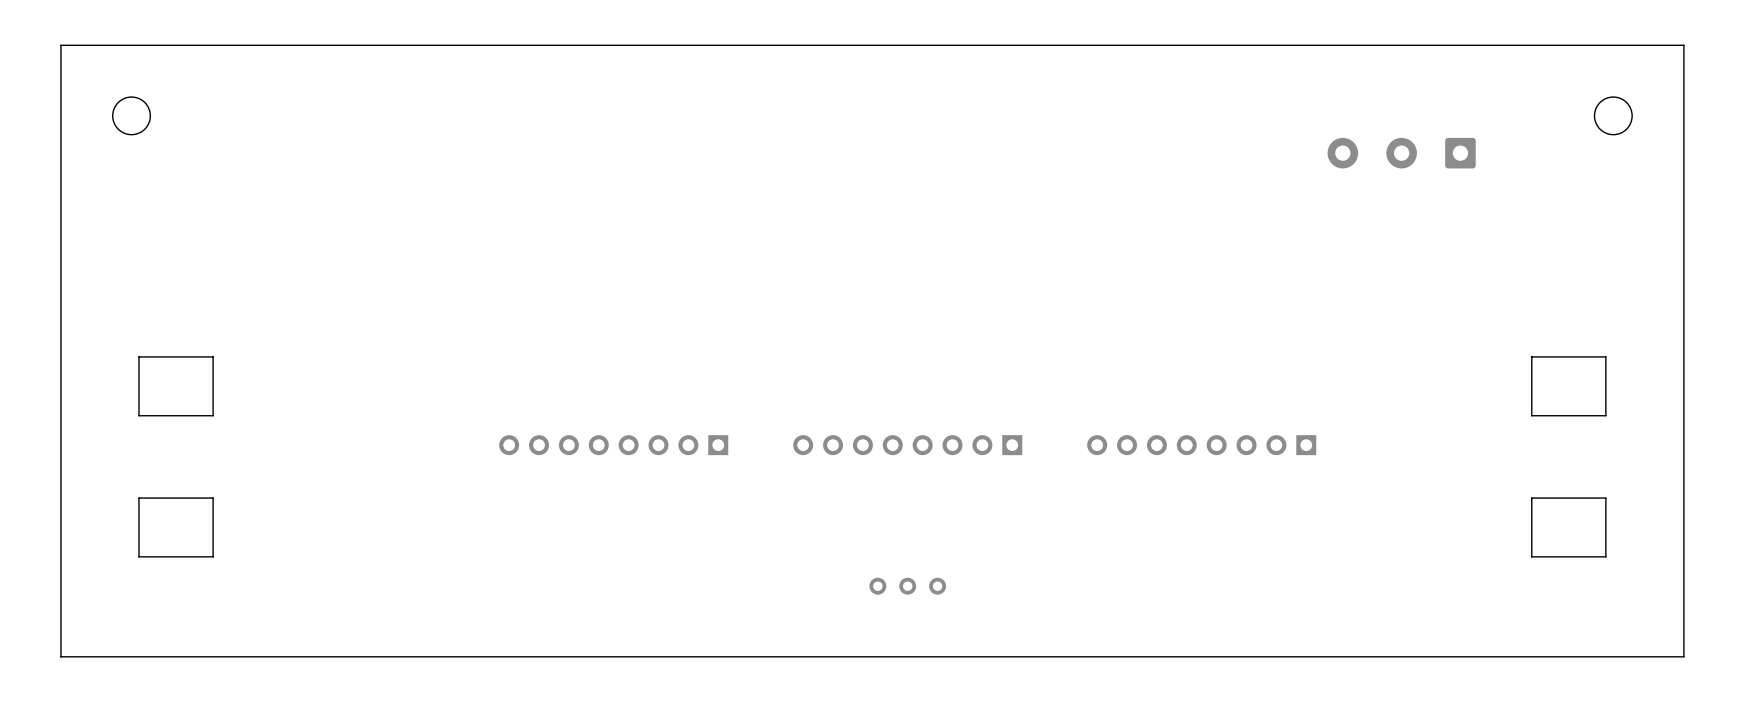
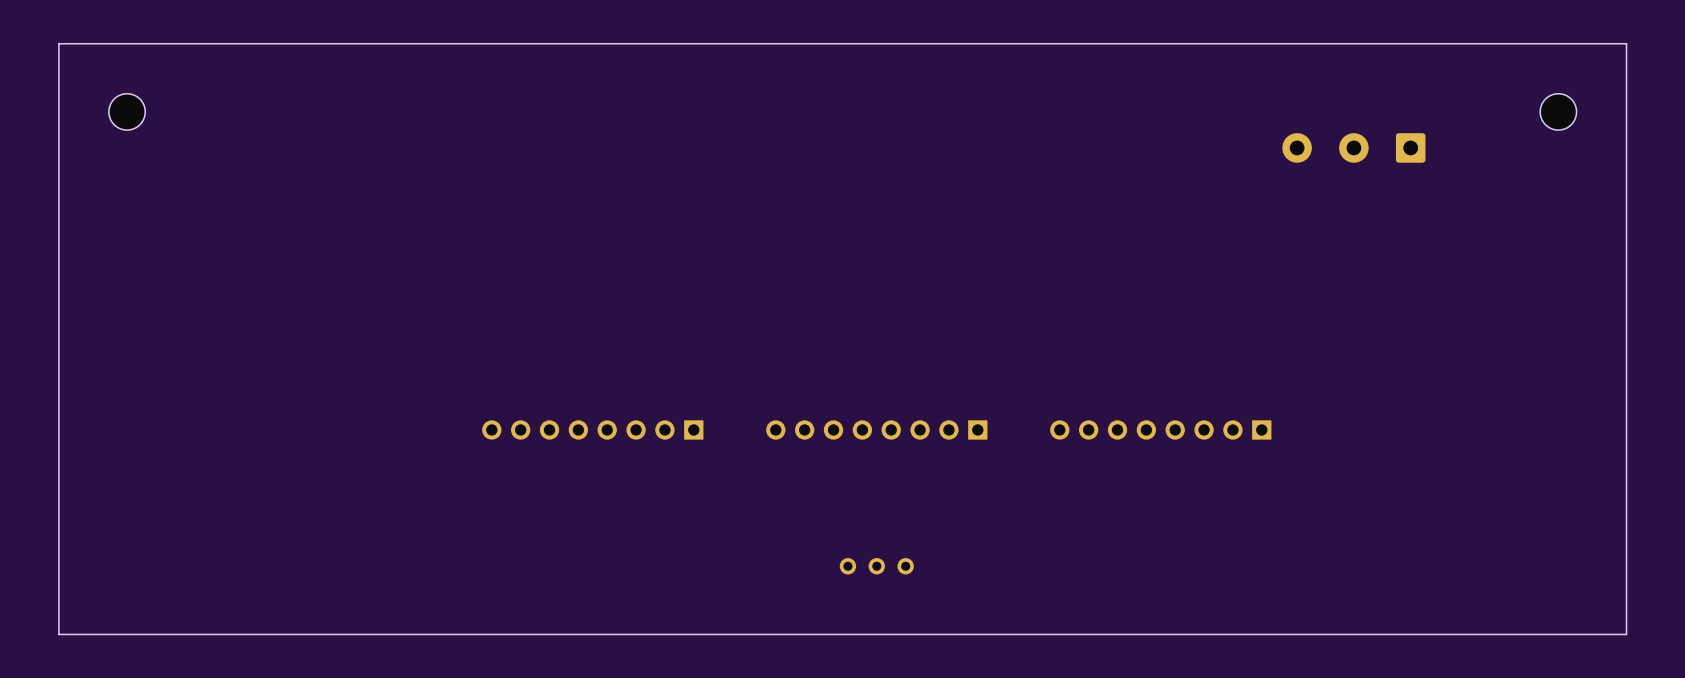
part: (176, 386) -> none
part: (1568, 386) -> none
part: (176, 527) -> none
part: (1568, 527) -> none

